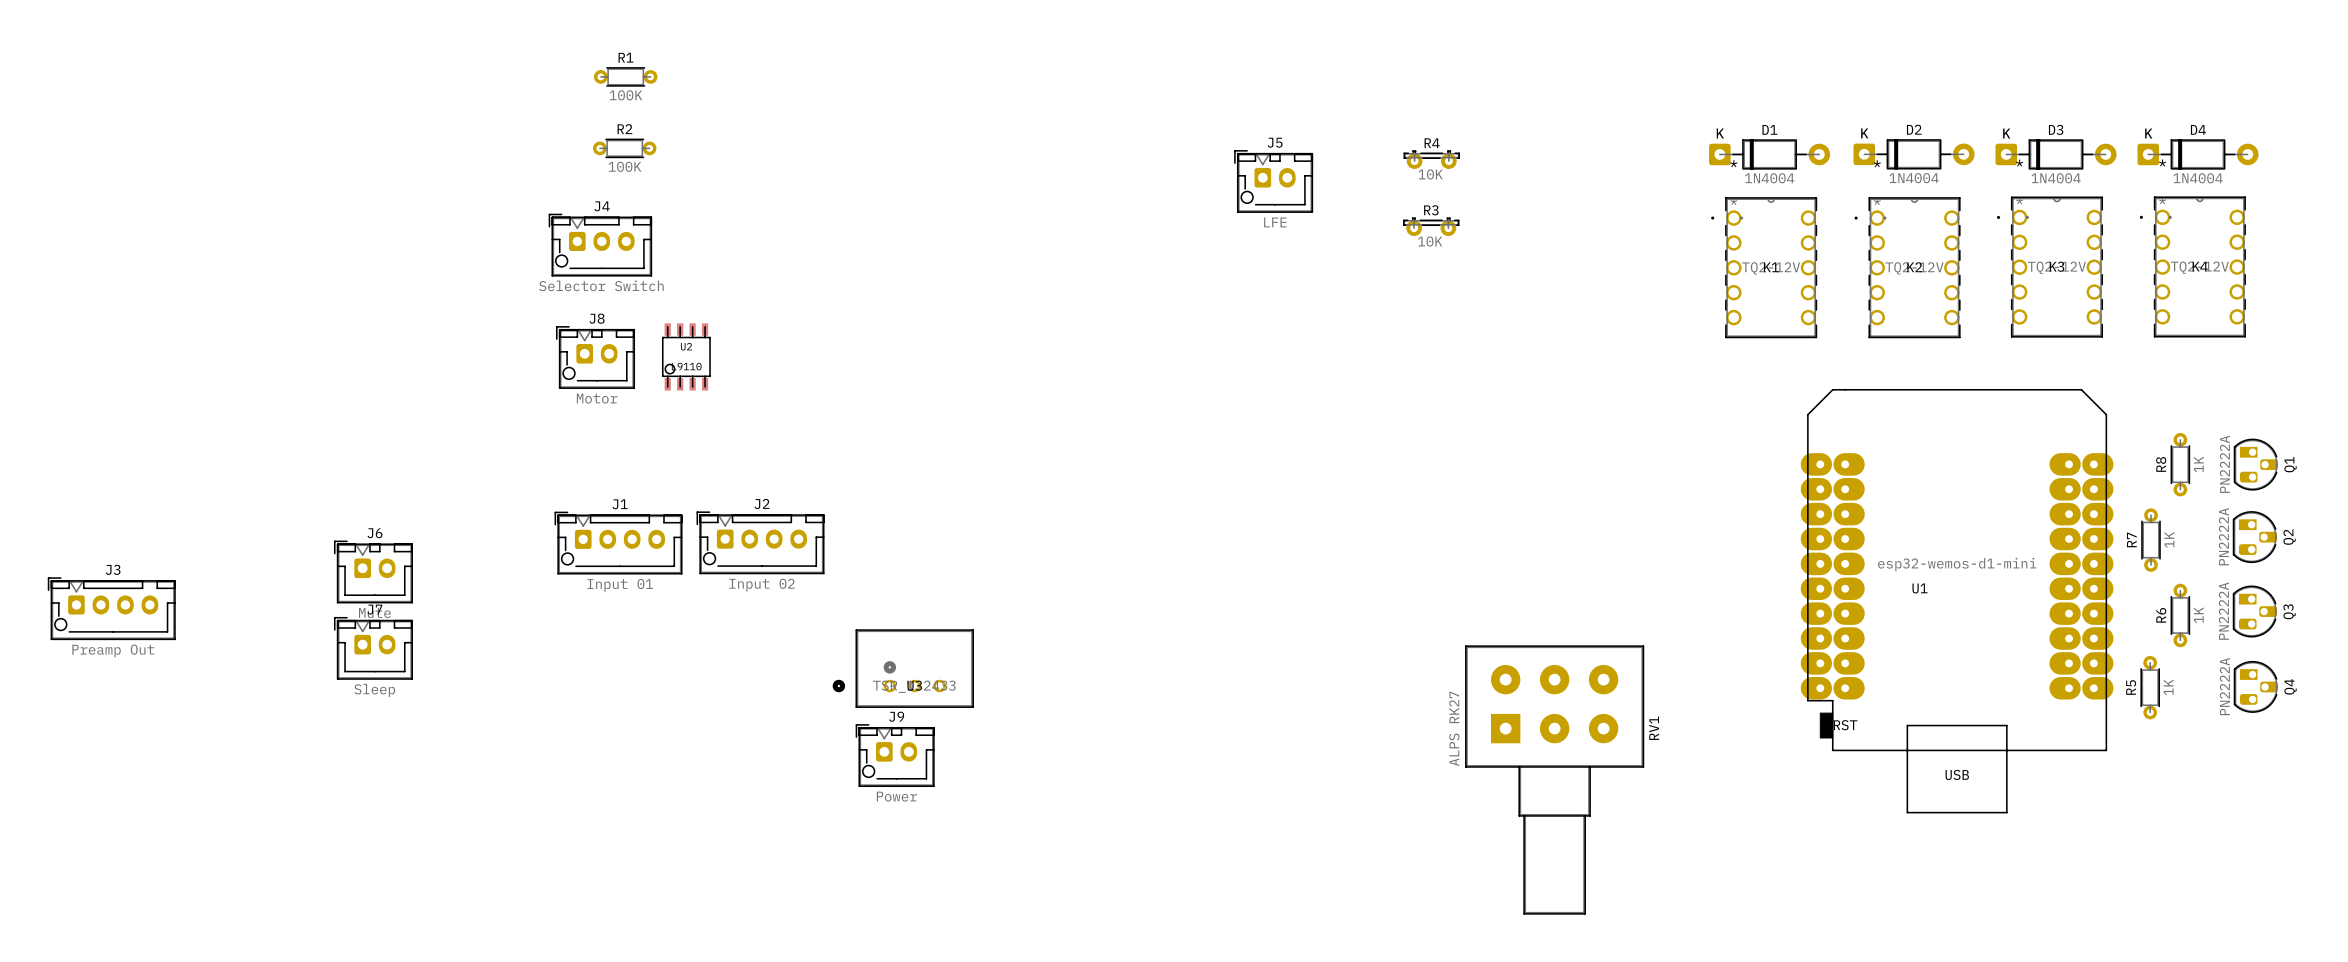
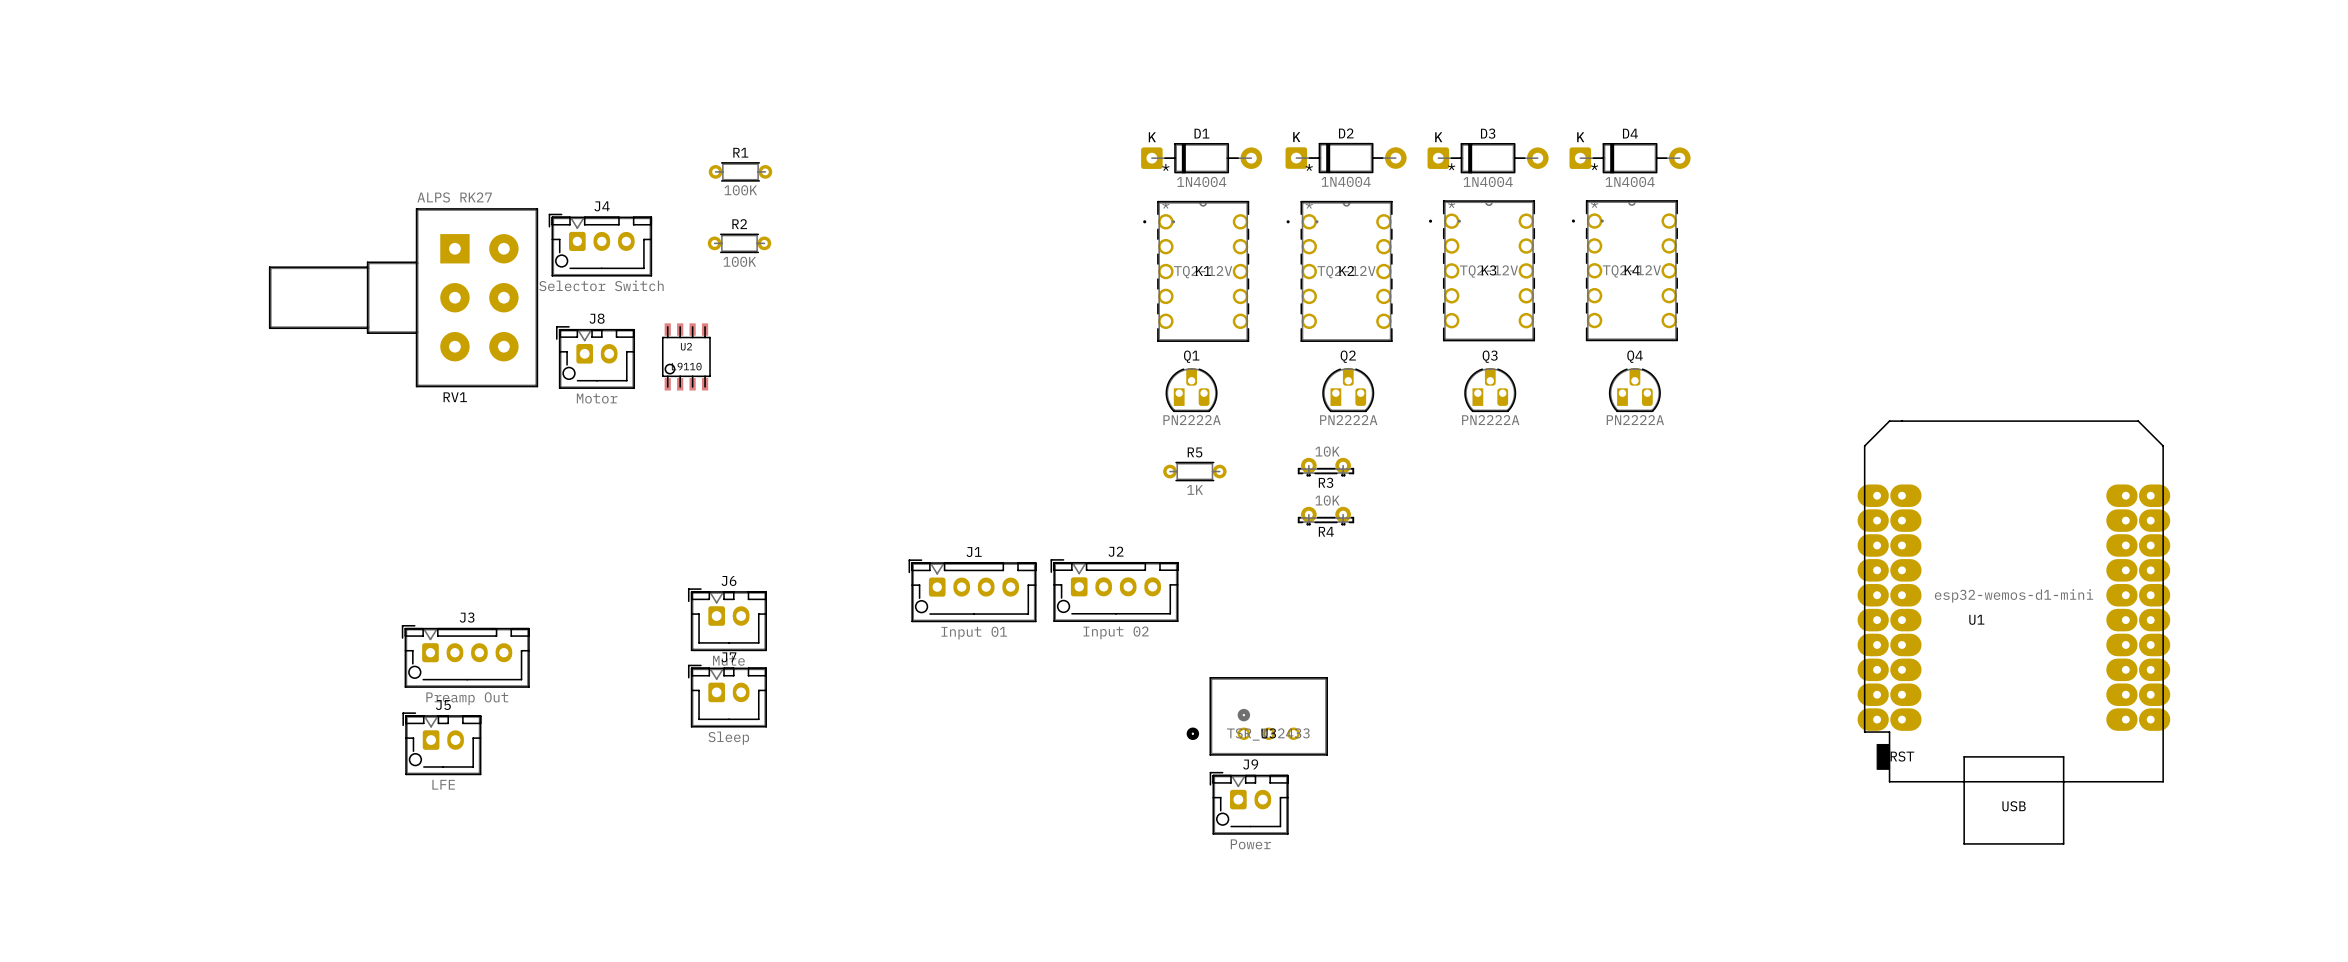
R1 position: (625, 76) -> (740, 171)
D2 footprint: [1853, 139, 1975, 170] -> [1285, 143, 1407, 174]
R2 position: (624, 148) -> (739, 243)
D1 position: (1769, 154) -> (1201, 158)
D3 position: (2056, 154) -> (1488, 158)
D4 position: (2198, 154) -> (1630, 158)
R4 rotation: 0° (1431, 159) -> 180° (1325, 516)
R4 position: (1431, 159) -> (1325, 516)
J5 position: (1273, 181) -> (441, 743)
R3 rotation: 0° (1431, 226) -> 180° (1325, 467)
R3 position: (1431, 226) -> (1325, 467)
K4 position: (2192, 266) -> (1624, 270)
K1 position: (1764, 267) -> (1196, 271)
K2 position: (1907, 267) -> (1339, 271)
K3 position: (2049, 267) -> (1482, 270)
R8: 1K (2180, 464) -> none
Q1 rotation: 0° (2255, 464) -> 90° counterclockwise (1191, 389)
Q1 position: (2255, 464) -> (1191, 389)
Q2 rotation: 0° (2254, 537) -> 90° counterclockwise (1348, 389)
Q2 position: (2254, 537) -> (1348, 389)
R7: 1K (2150, 540) -> none
J2 position: (760, 542) -> (1114, 590)
J1 position: (618, 543) -> (972, 590)
J6 position: (373, 572) -> (727, 619)
U1 position: (1957, 601) -> (2013, 632)
J3 position: (111, 608) -> (465, 656)
Q3 rotation: 0° (2254, 611) -> 90° counterclockwise (1490, 389)
Q3 position: (2254, 611) -> (1490, 389)
R6: 1K (2180, 615) -> none
J7 position: (373, 648) -> (727, 696)
U3 position: (903, 668) -> (1257, 716)
Q4 rotation: 0° (2255, 686) -> 90° counterclockwise (1634, 389)
Q4 position: (2255, 686) -> (1634, 389)
R5 rotation: 0° (2150, 687) -> 90° clockwise (1194, 471)
R5 position: (2150, 687) -> (1194, 471)
J9 position: (895, 755) -> (1249, 803)
RV1 rotation: 0° (1554, 780) -> 90° clockwise (403, 297)
RV1 position: (1554, 780) -> (403, 297)

